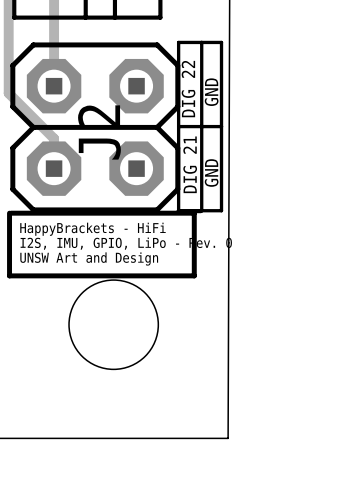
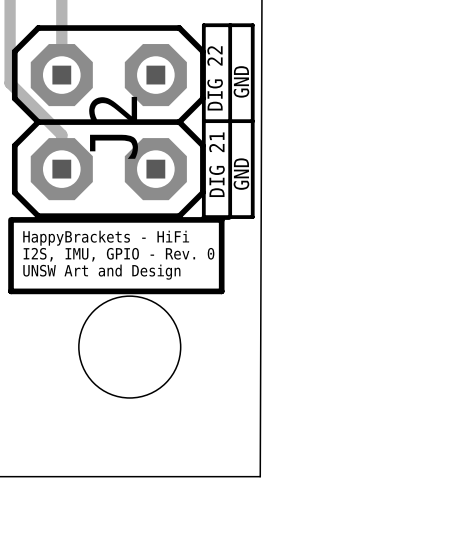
text: I2S, IMU, GPIO, LiPo - Rev. 0 (126, 243) -> I2S, IMU, GPIO - Rev. 0 (119, 254)

